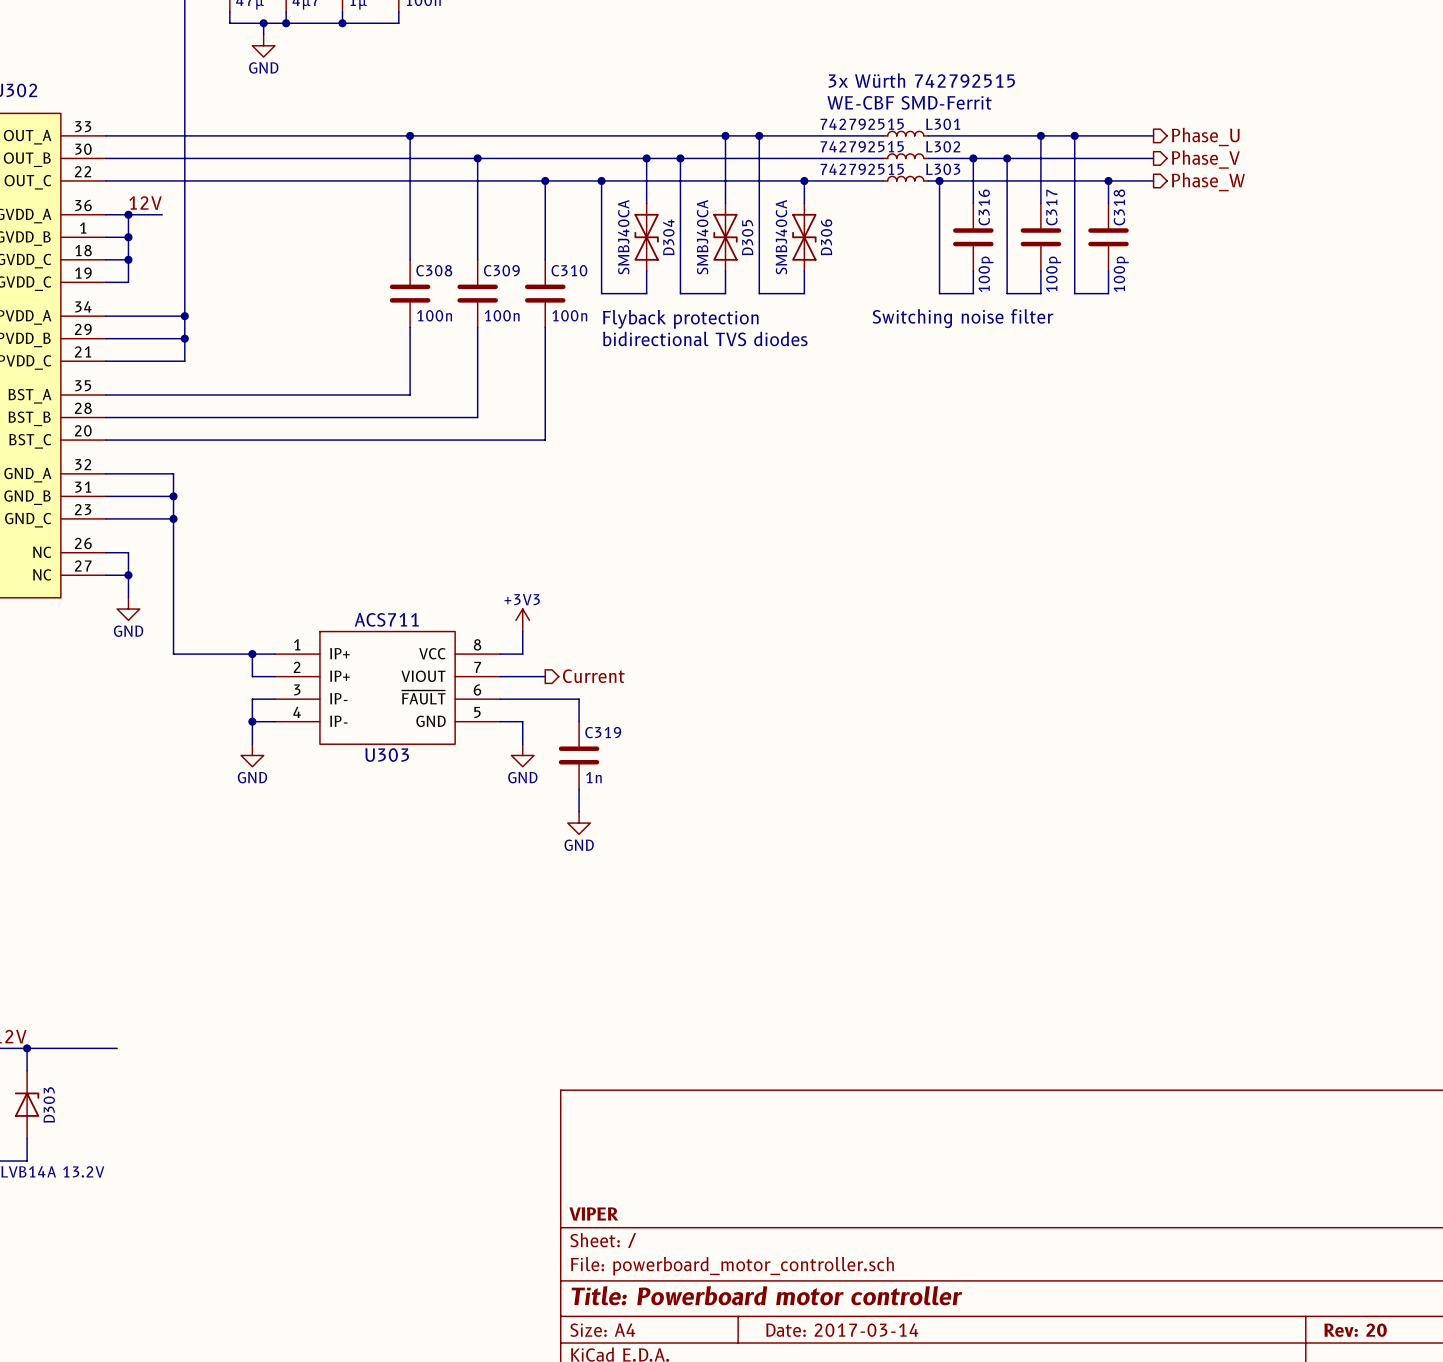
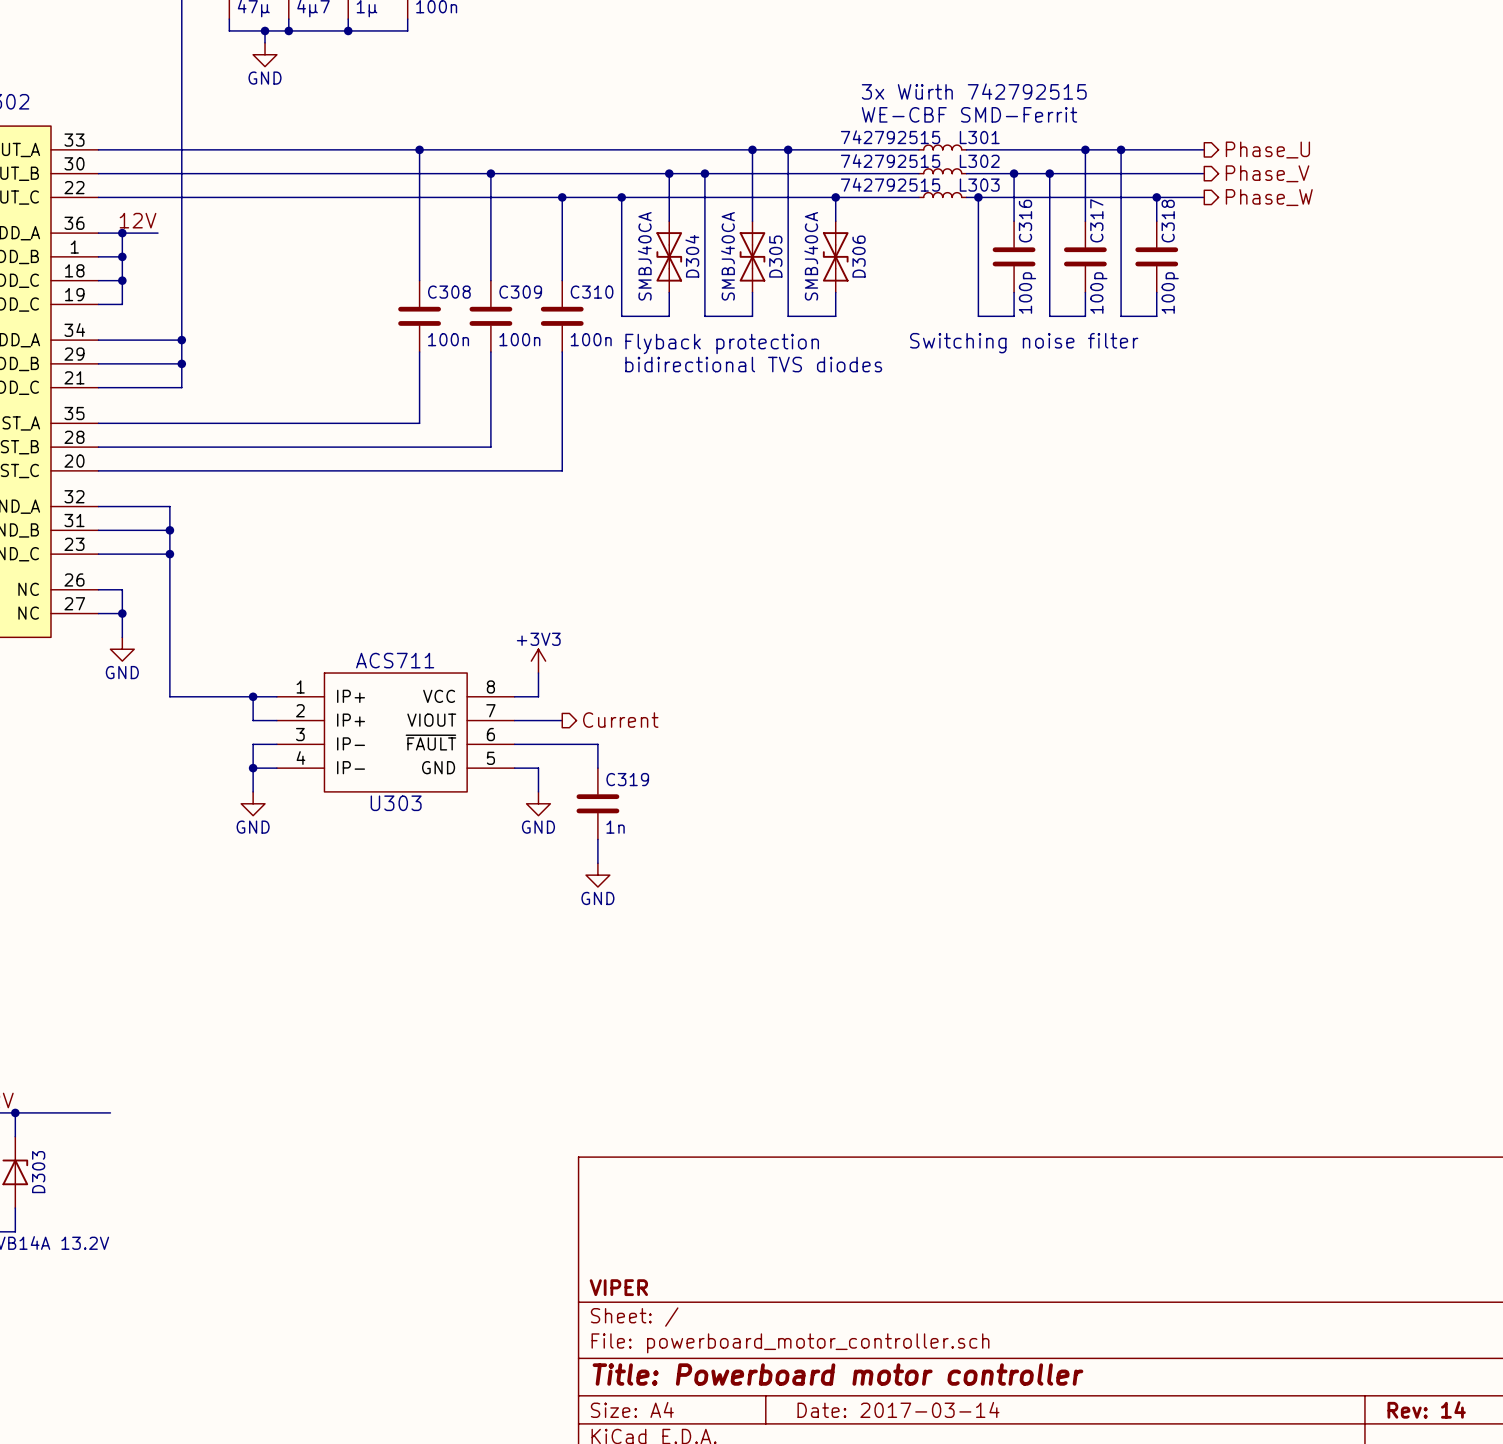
title block: Rev: 20 (1355, 1330) -> Rev: 14 (1426, 1409)

